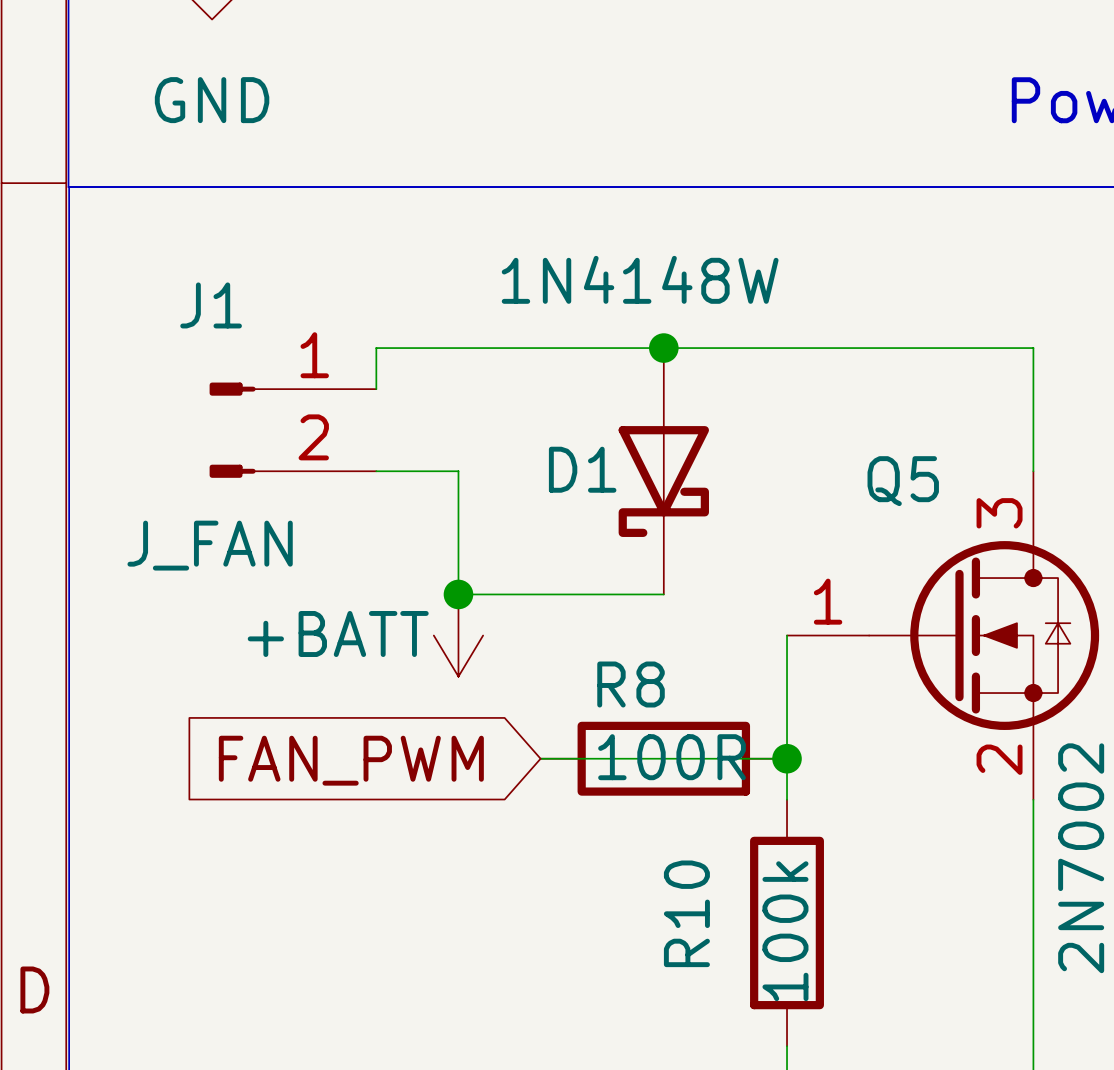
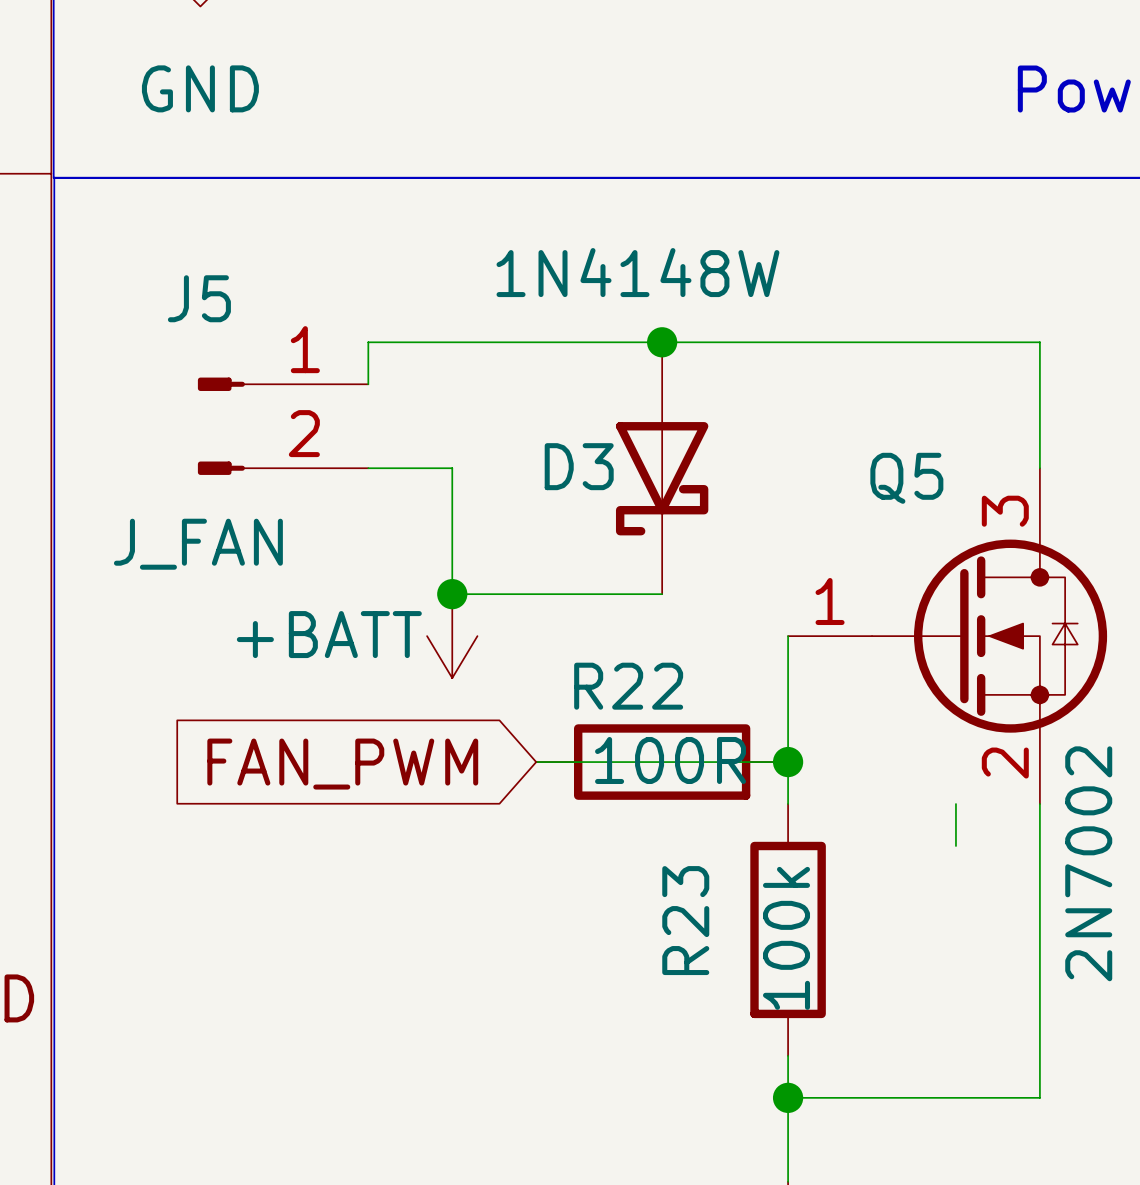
J1 name: J1 (211, 305) -> J5 (199, 298)
D1 name: D1 (582, 469) -> D3 (579, 466)
R8 name: R8 (631, 684) -> R22 (628, 686)
wire: none -> (955, 804) (955, 846)
R10 name: R10 (686, 913) -> R23 (685, 920)

